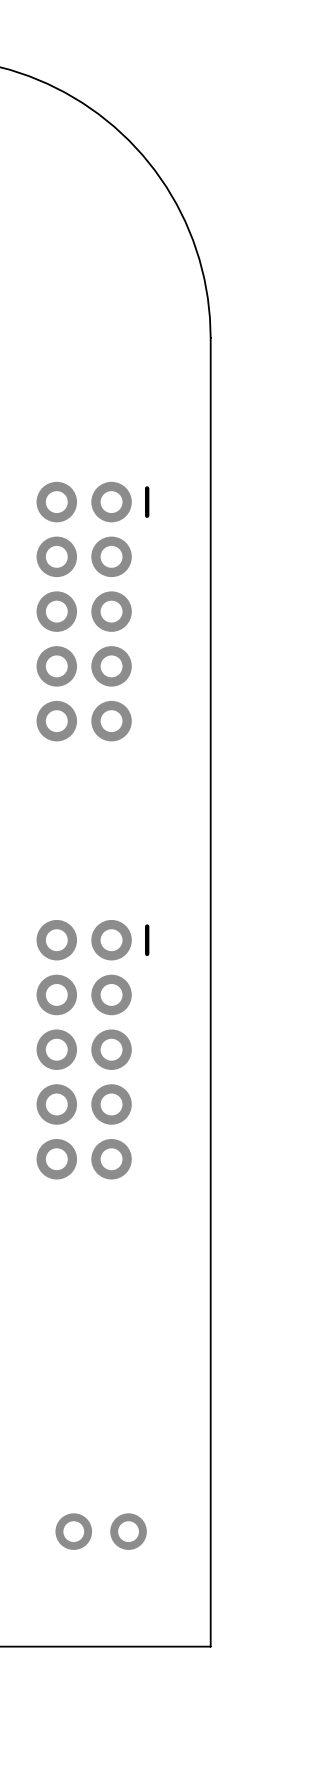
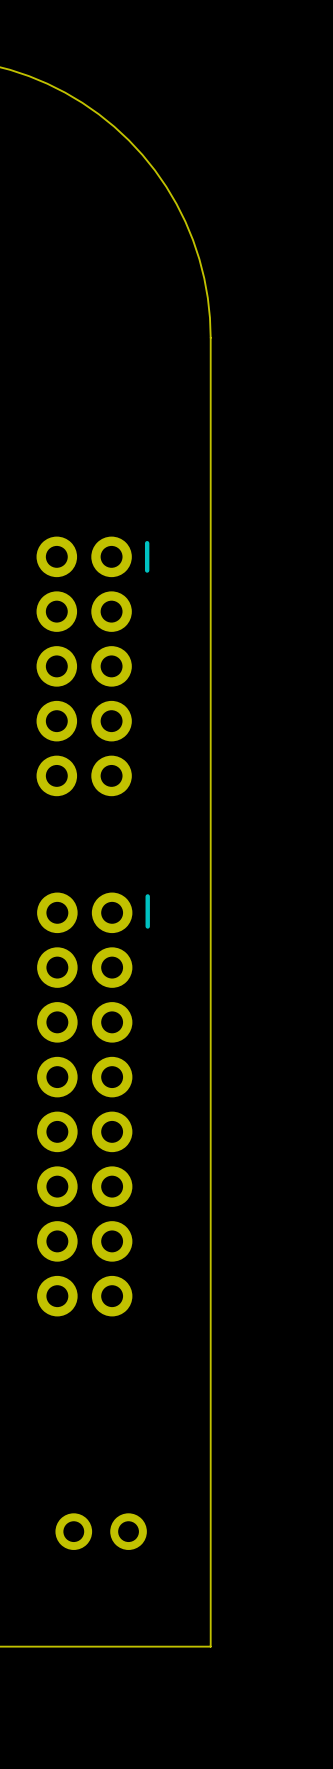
part position: (92, 611) -> (92, 666)
part: (92, 1049) -> none
part: none -> (93, 1104)

